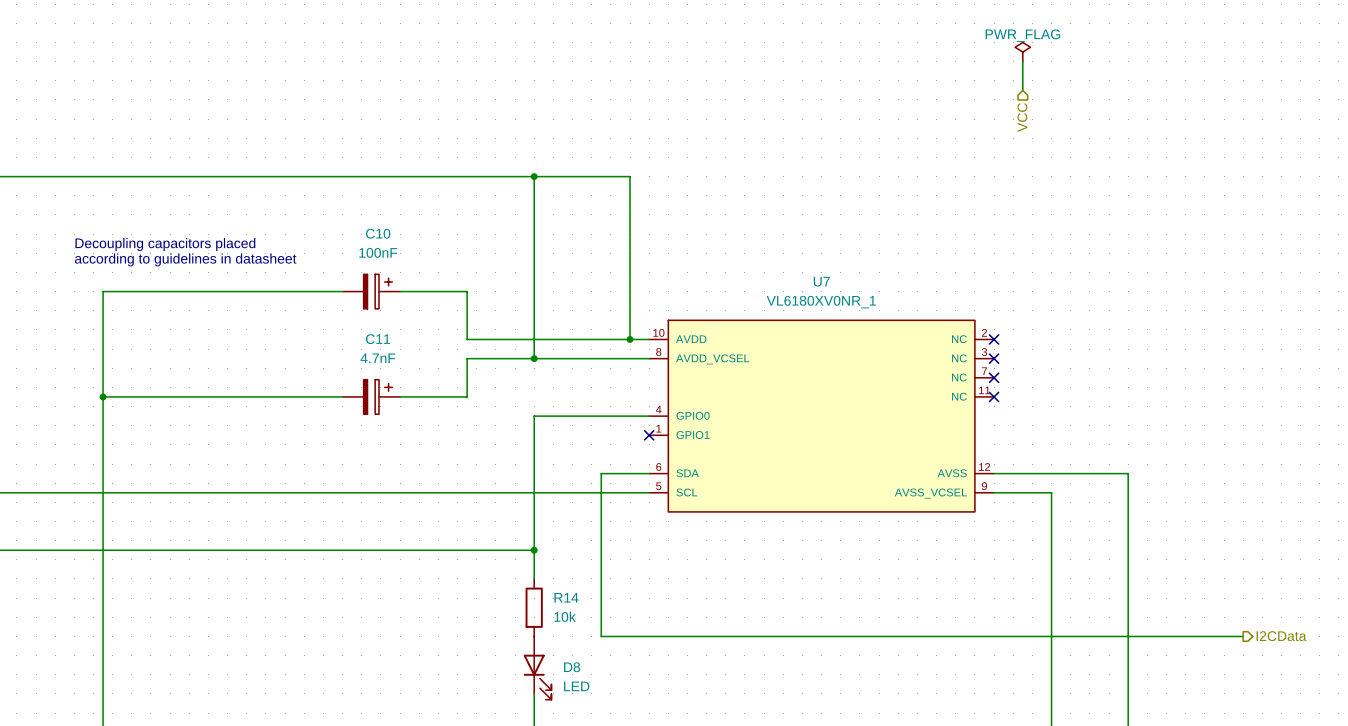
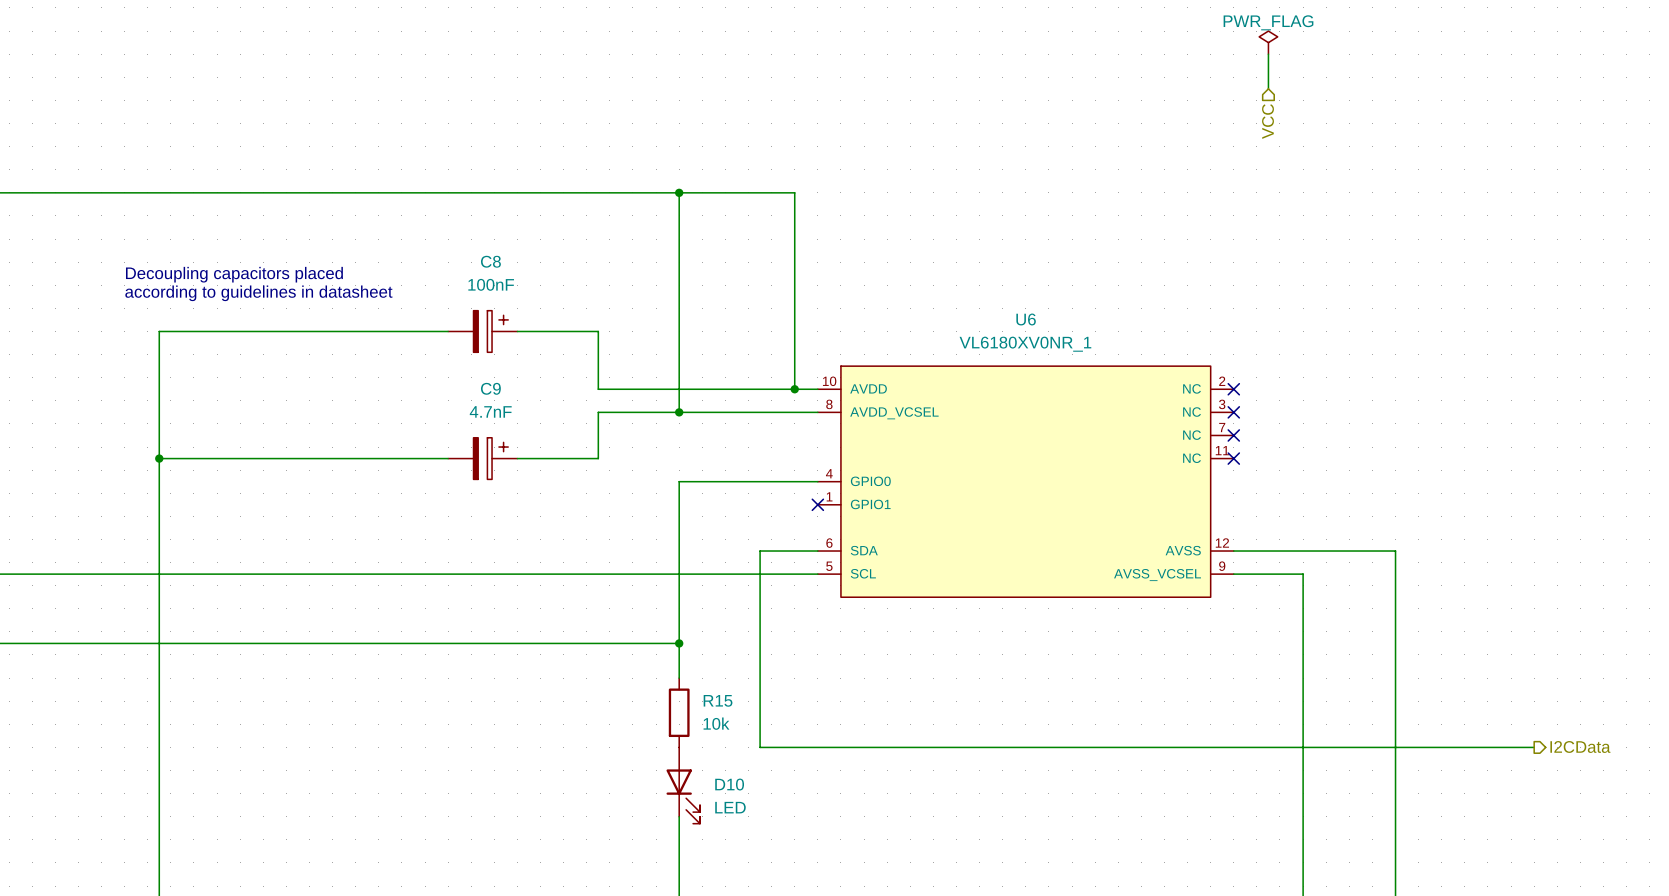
C10 name: C10 (378, 233) -> C8 (490, 261)
U7 name: U7 (821, 281) -> U6 (1026, 319)
C11 name: C11 (378, 339) -> C9 (490, 388)
R14 name: R14 (566, 597) -> R15 (718, 700)
D8 name: D8 (572, 667) -> D10 (729, 784)

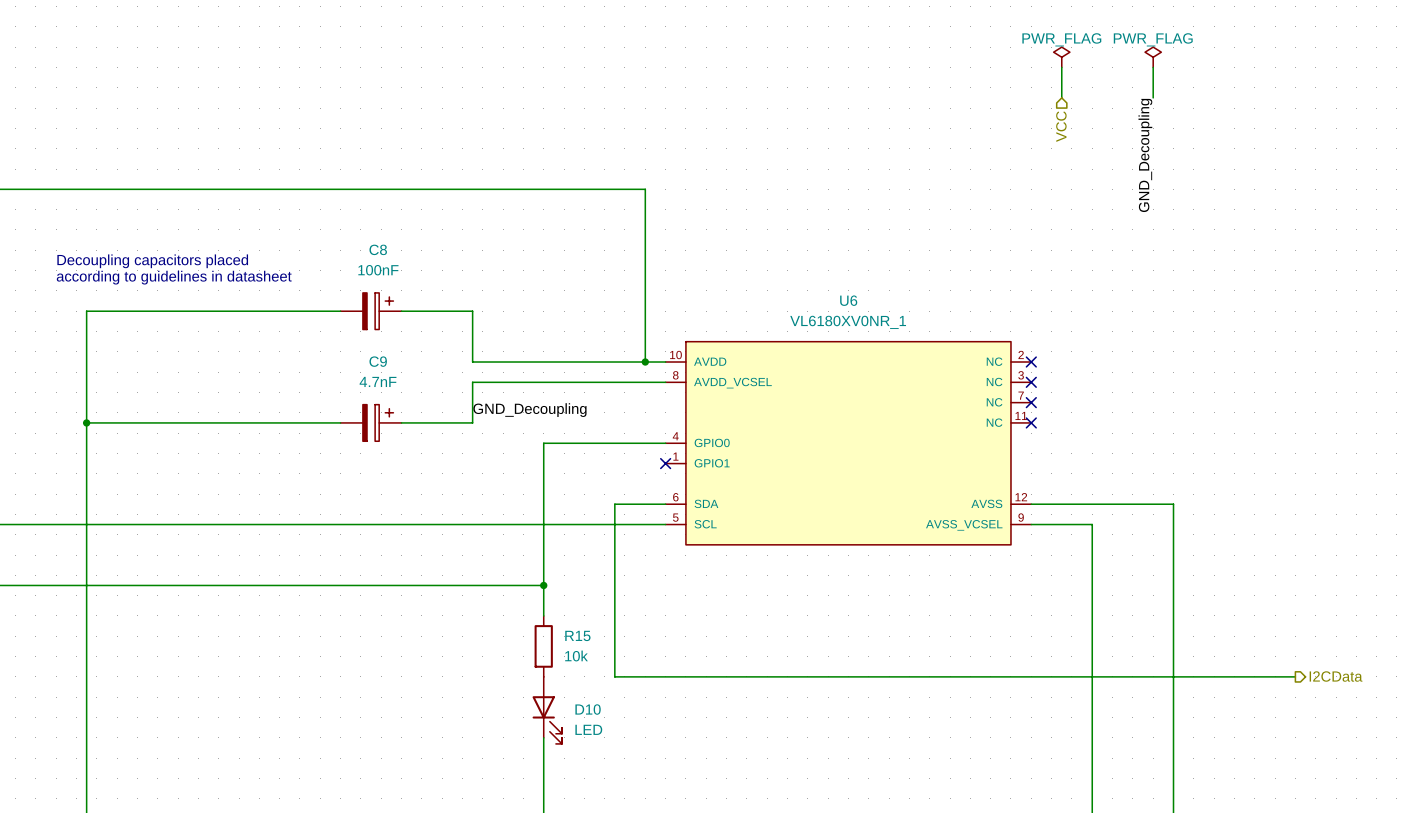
power symbol: none -> PWR_FLAG (1153, 57)
wire: none -> (1153, 67) (1153, 97)
label: none -> GND_Decoupling (1145, 155)
wire: (679, 192) (679, 412) -> none
junction: (679, 192) -> none
junction: (679, 412) -> none
label: none -> GND_Decoupling (529, 410)

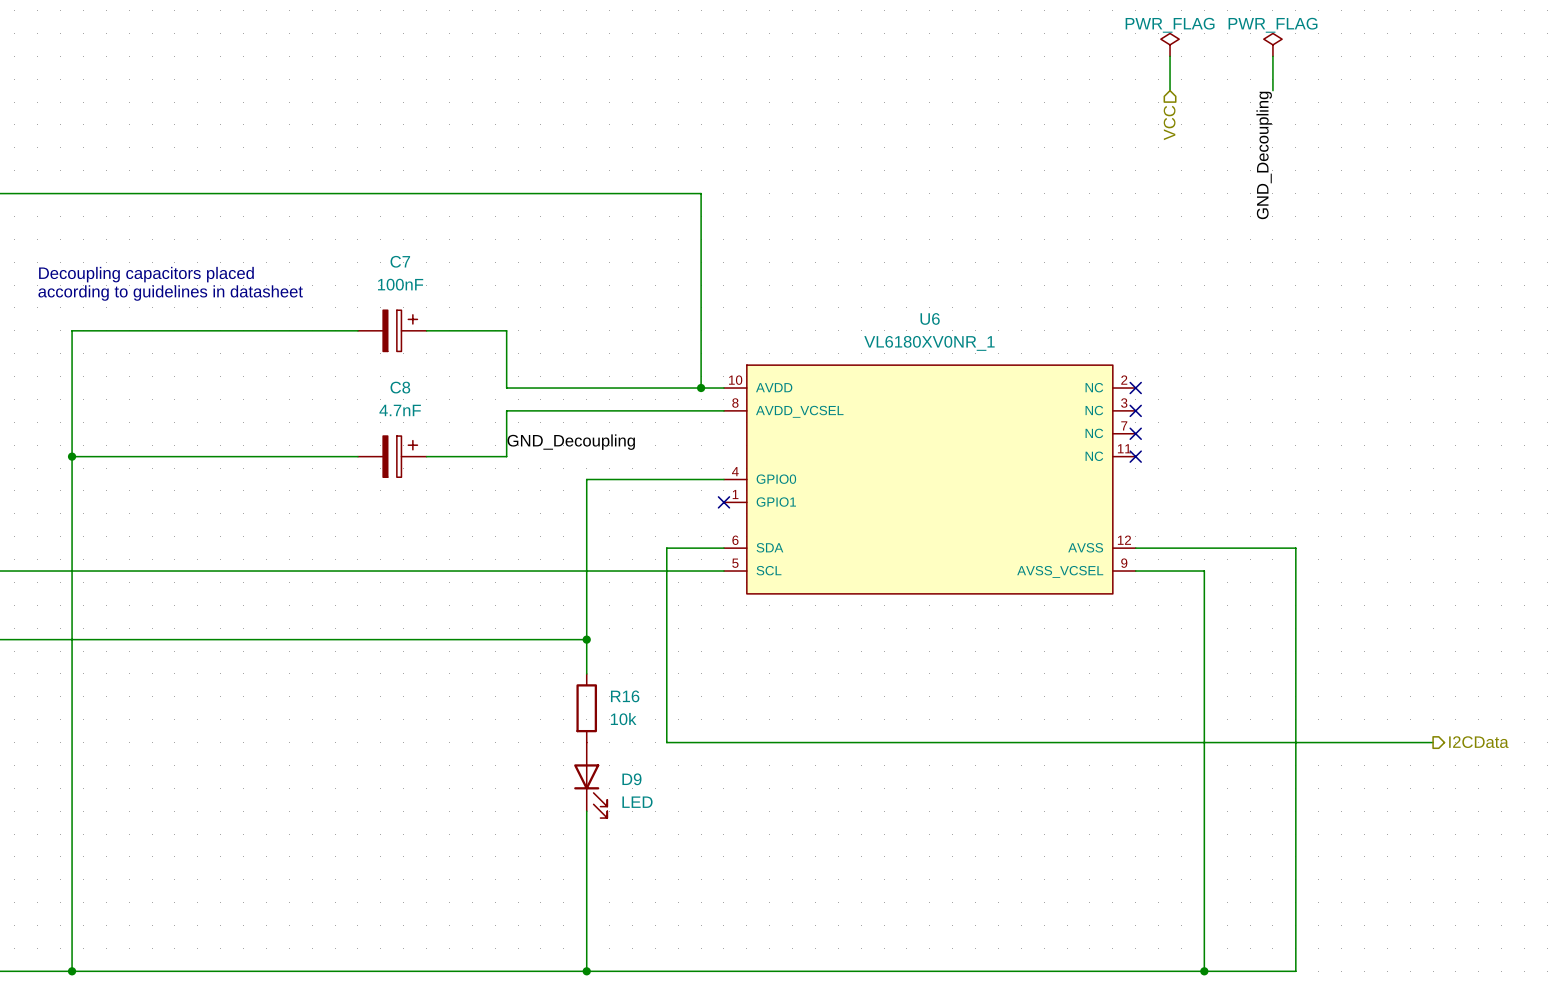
C8 name: C8 (378, 249) -> C7 (400, 261)
C9 name: C9 (378, 361) -> C8 (400, 387)
R15 name: R15 (577, 635) -> R16 (625, 696)
D10 name: D10 (588, 709) -> D9 (631, 779)

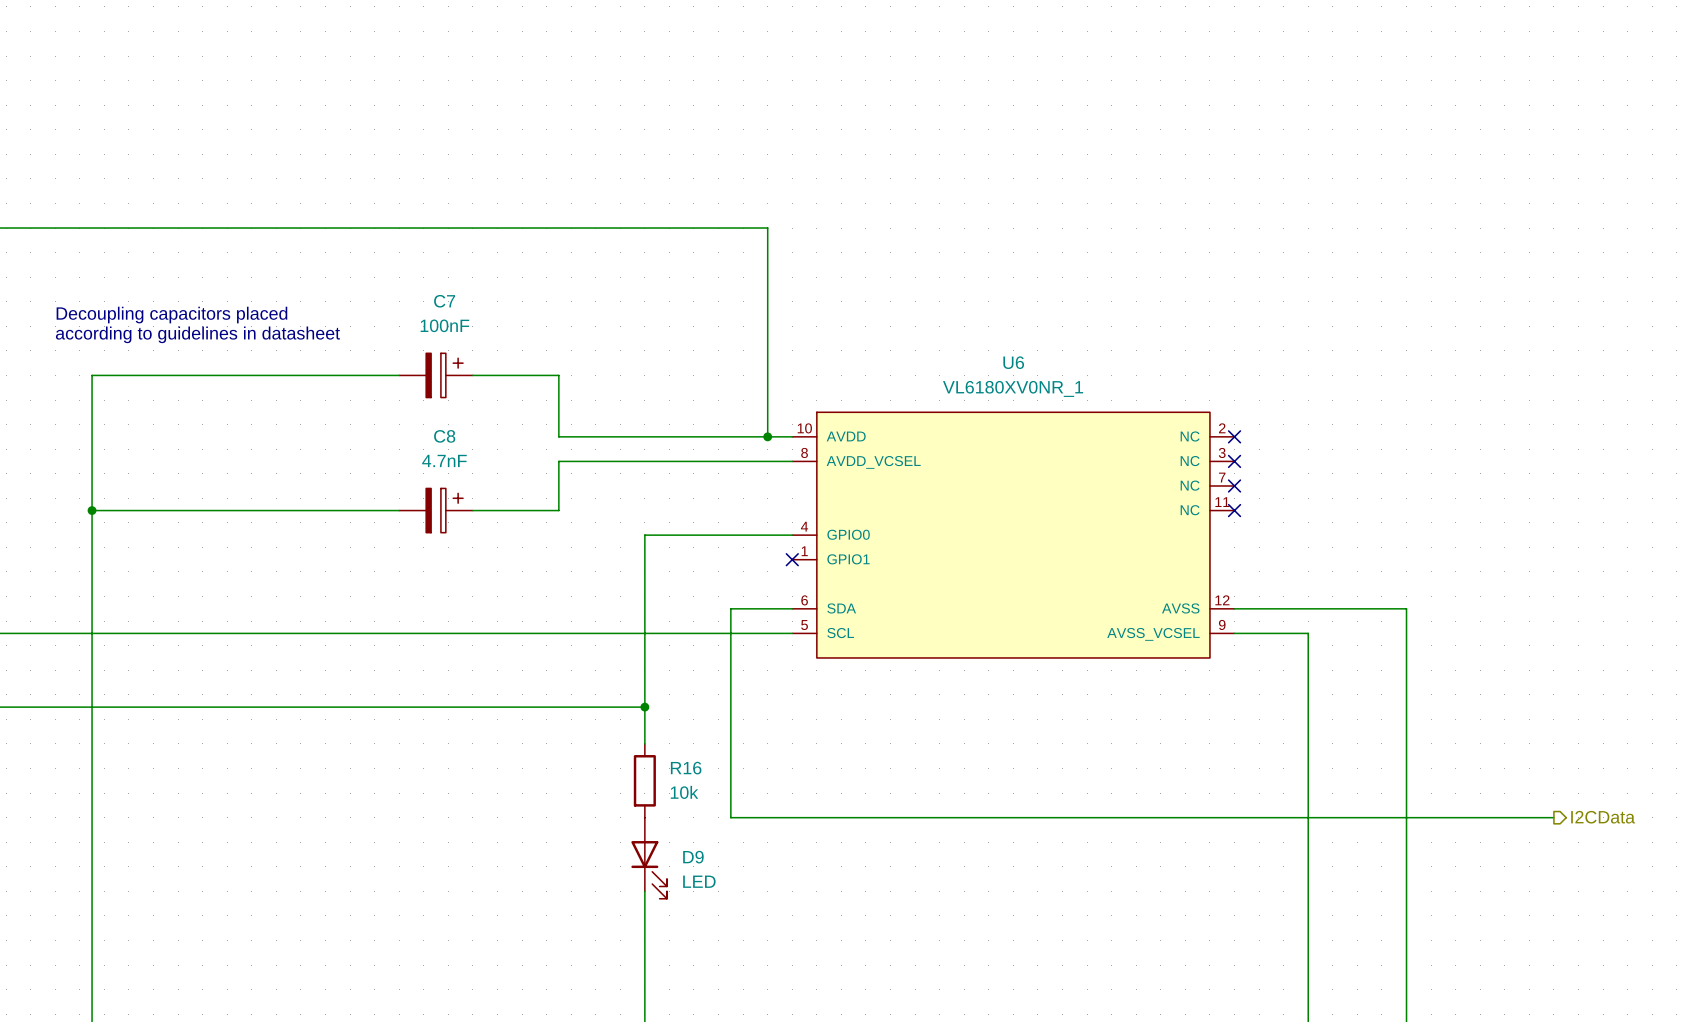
power symbol: PWR_FLAG (1170, 44) -> none
power symbol: PWR_FLAG (1272, 44) -> none
wire: (1170, 56) (1170, 90) -> none
wire: (1272, 56) (1272, 90) -> none
hierarchical label: VCC (1169, 123) -> none
label: GND_Decoupling (1264, 155) -> none
label: GND_Decoupling (571, 442) -> none

